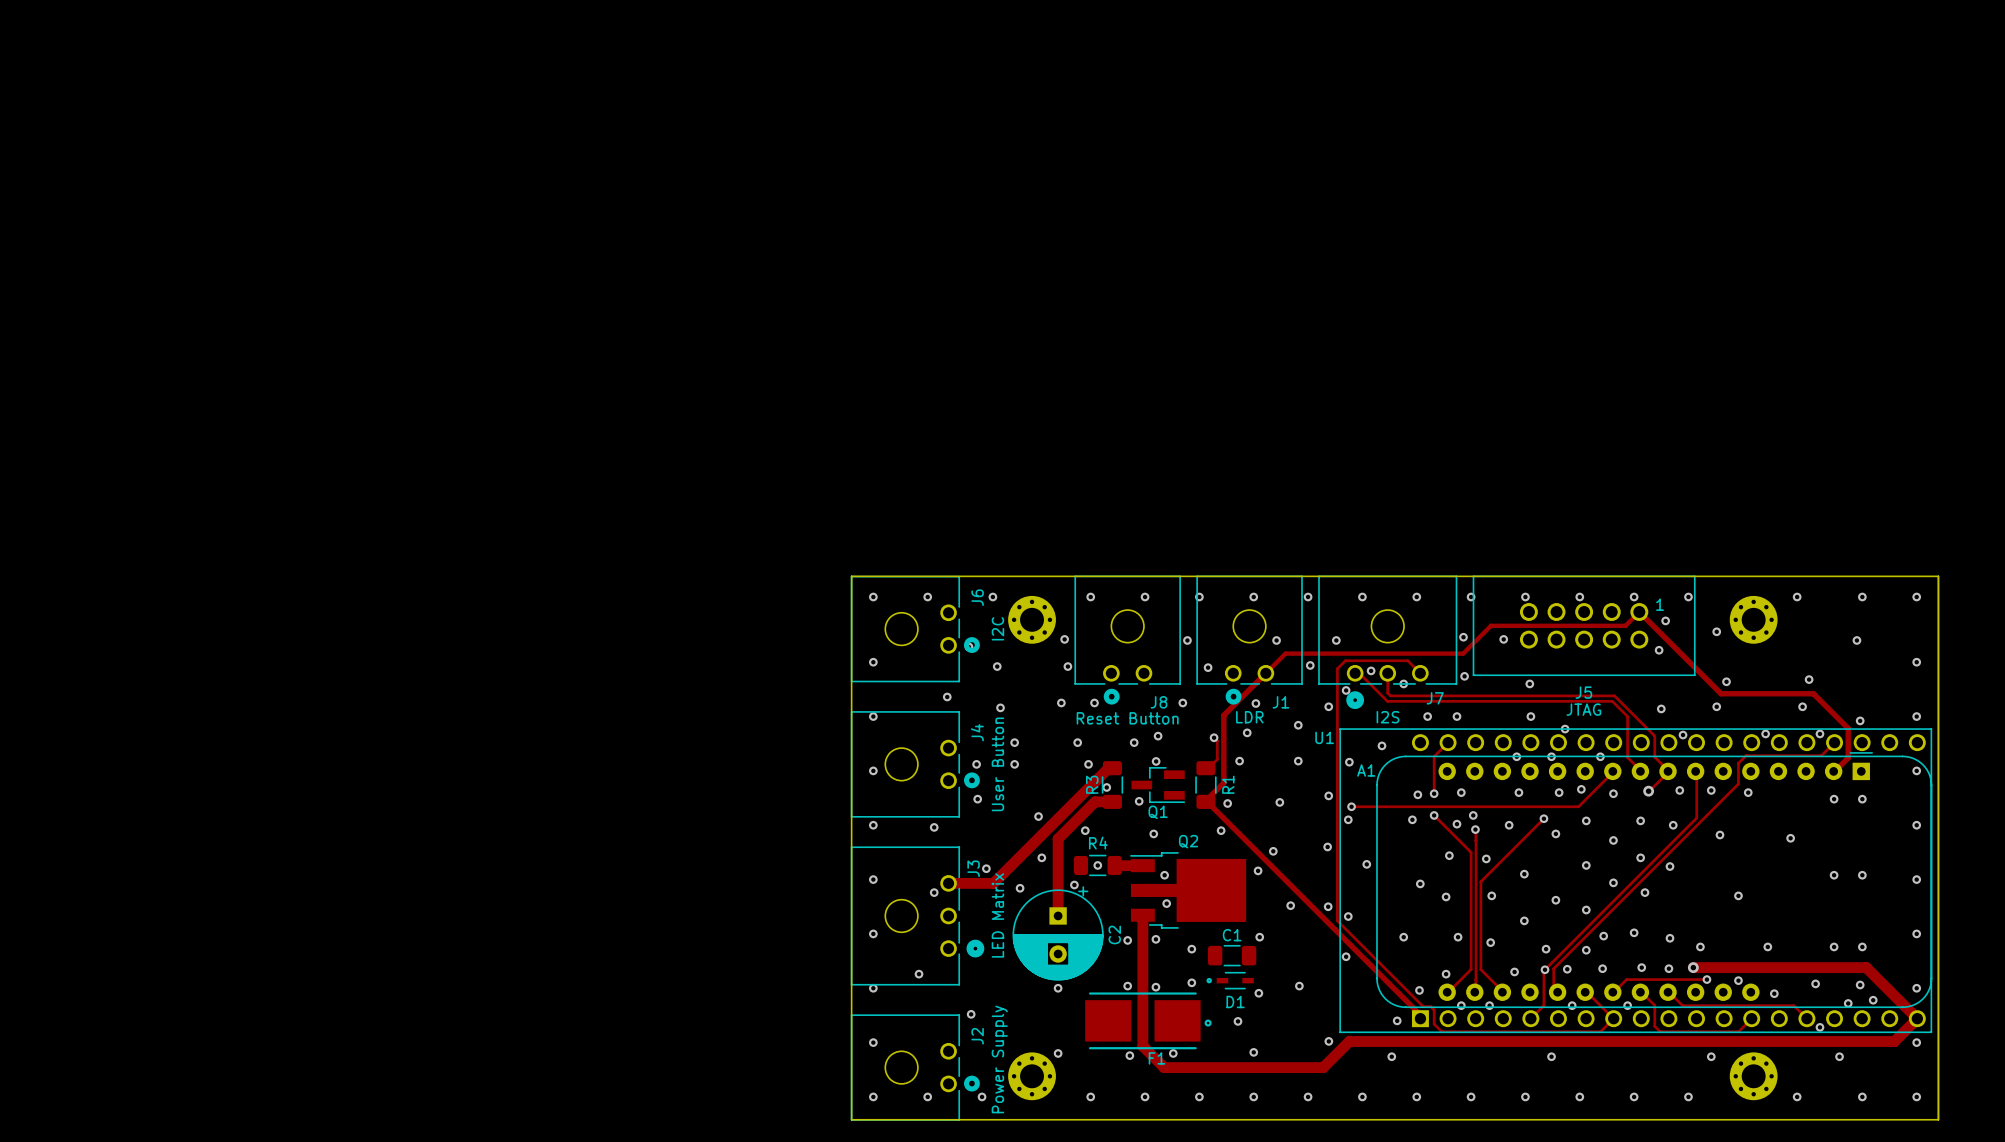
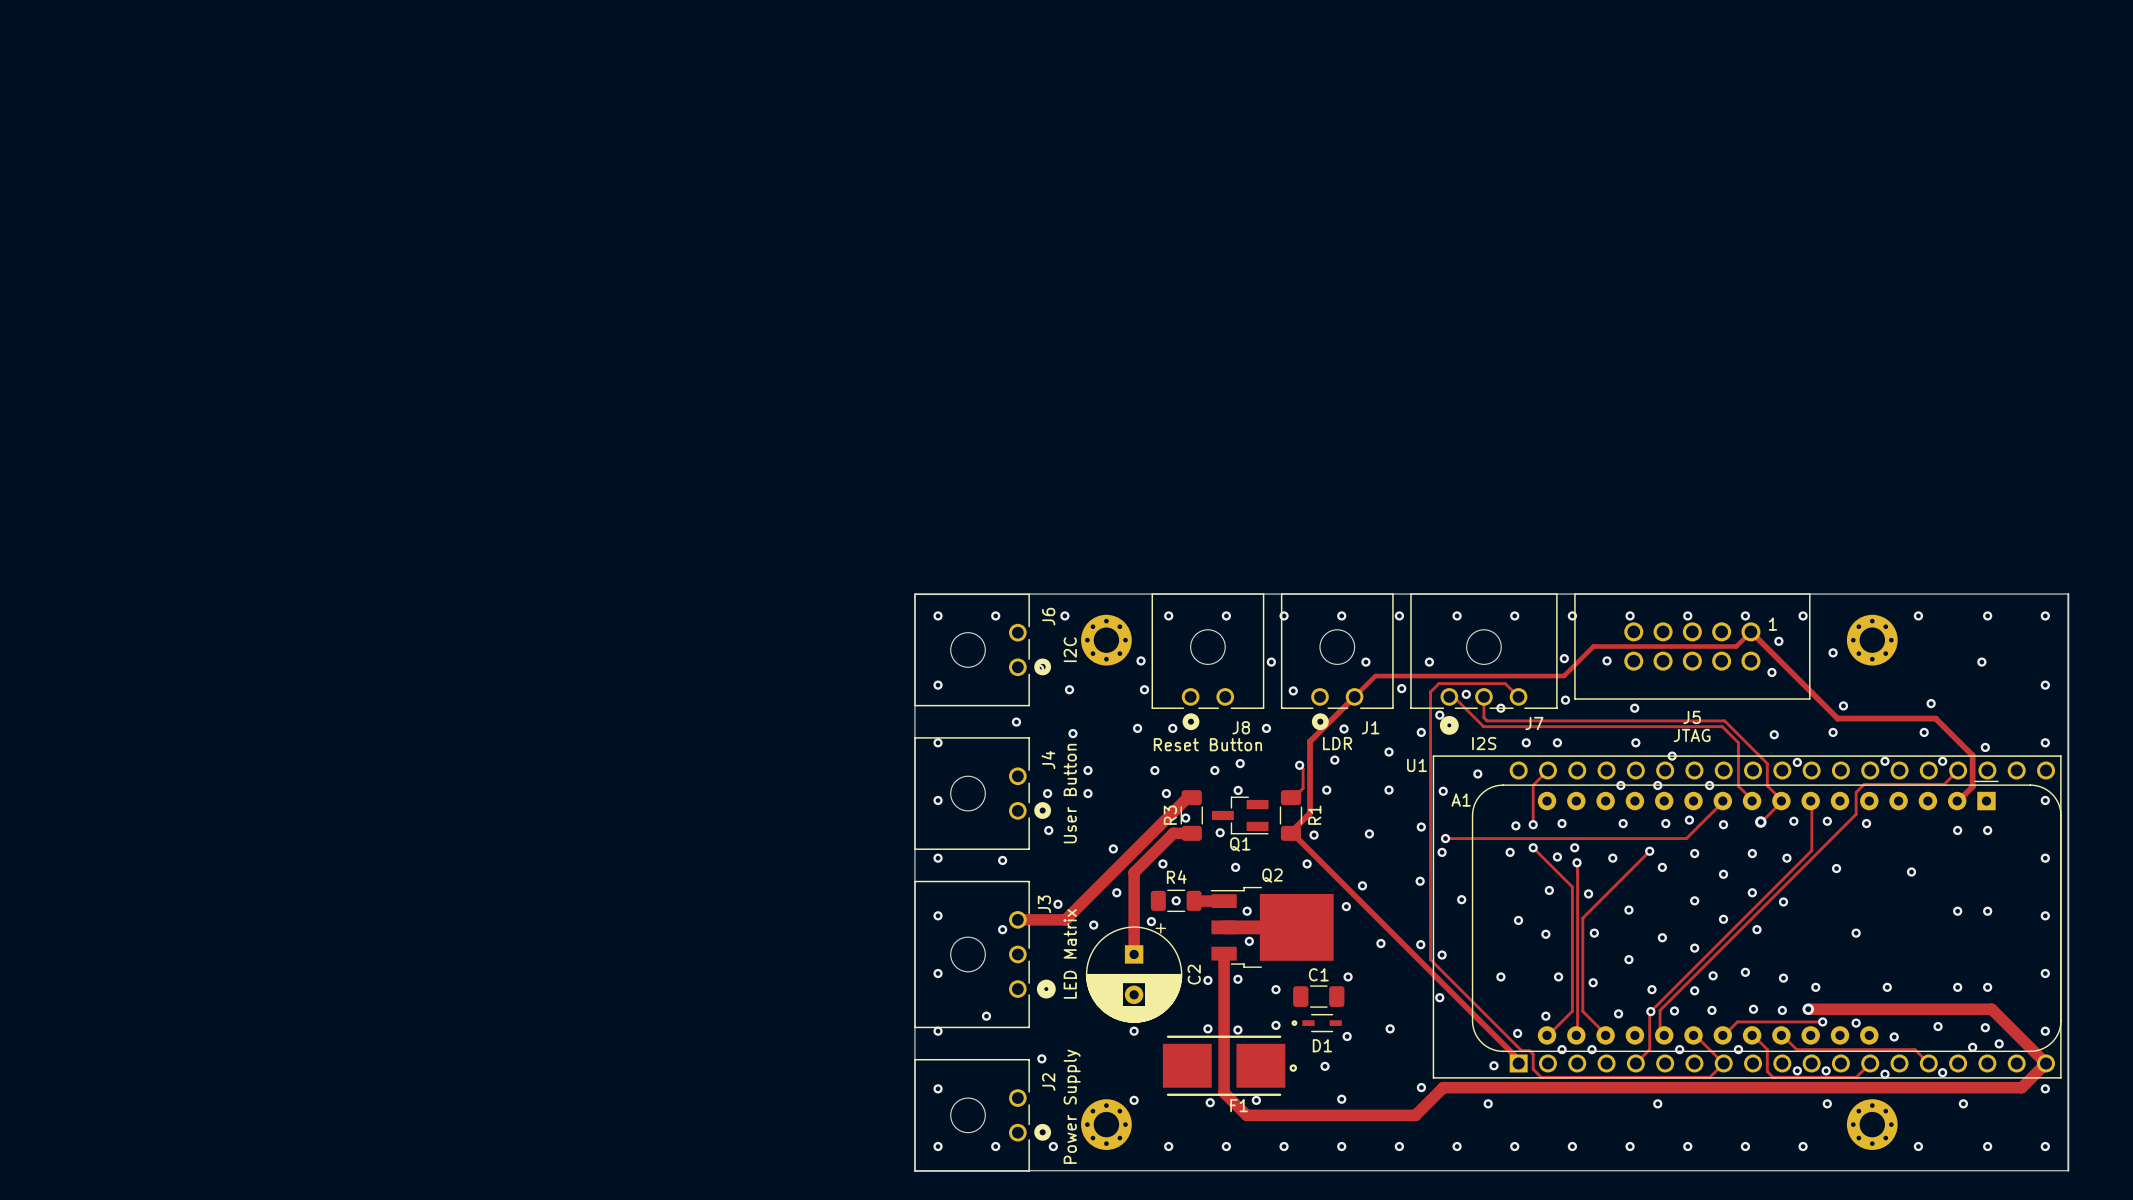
via: none -> (1797, 1070)
via: none -> (1826, 1070)
via: none -> (1884, 1074)

